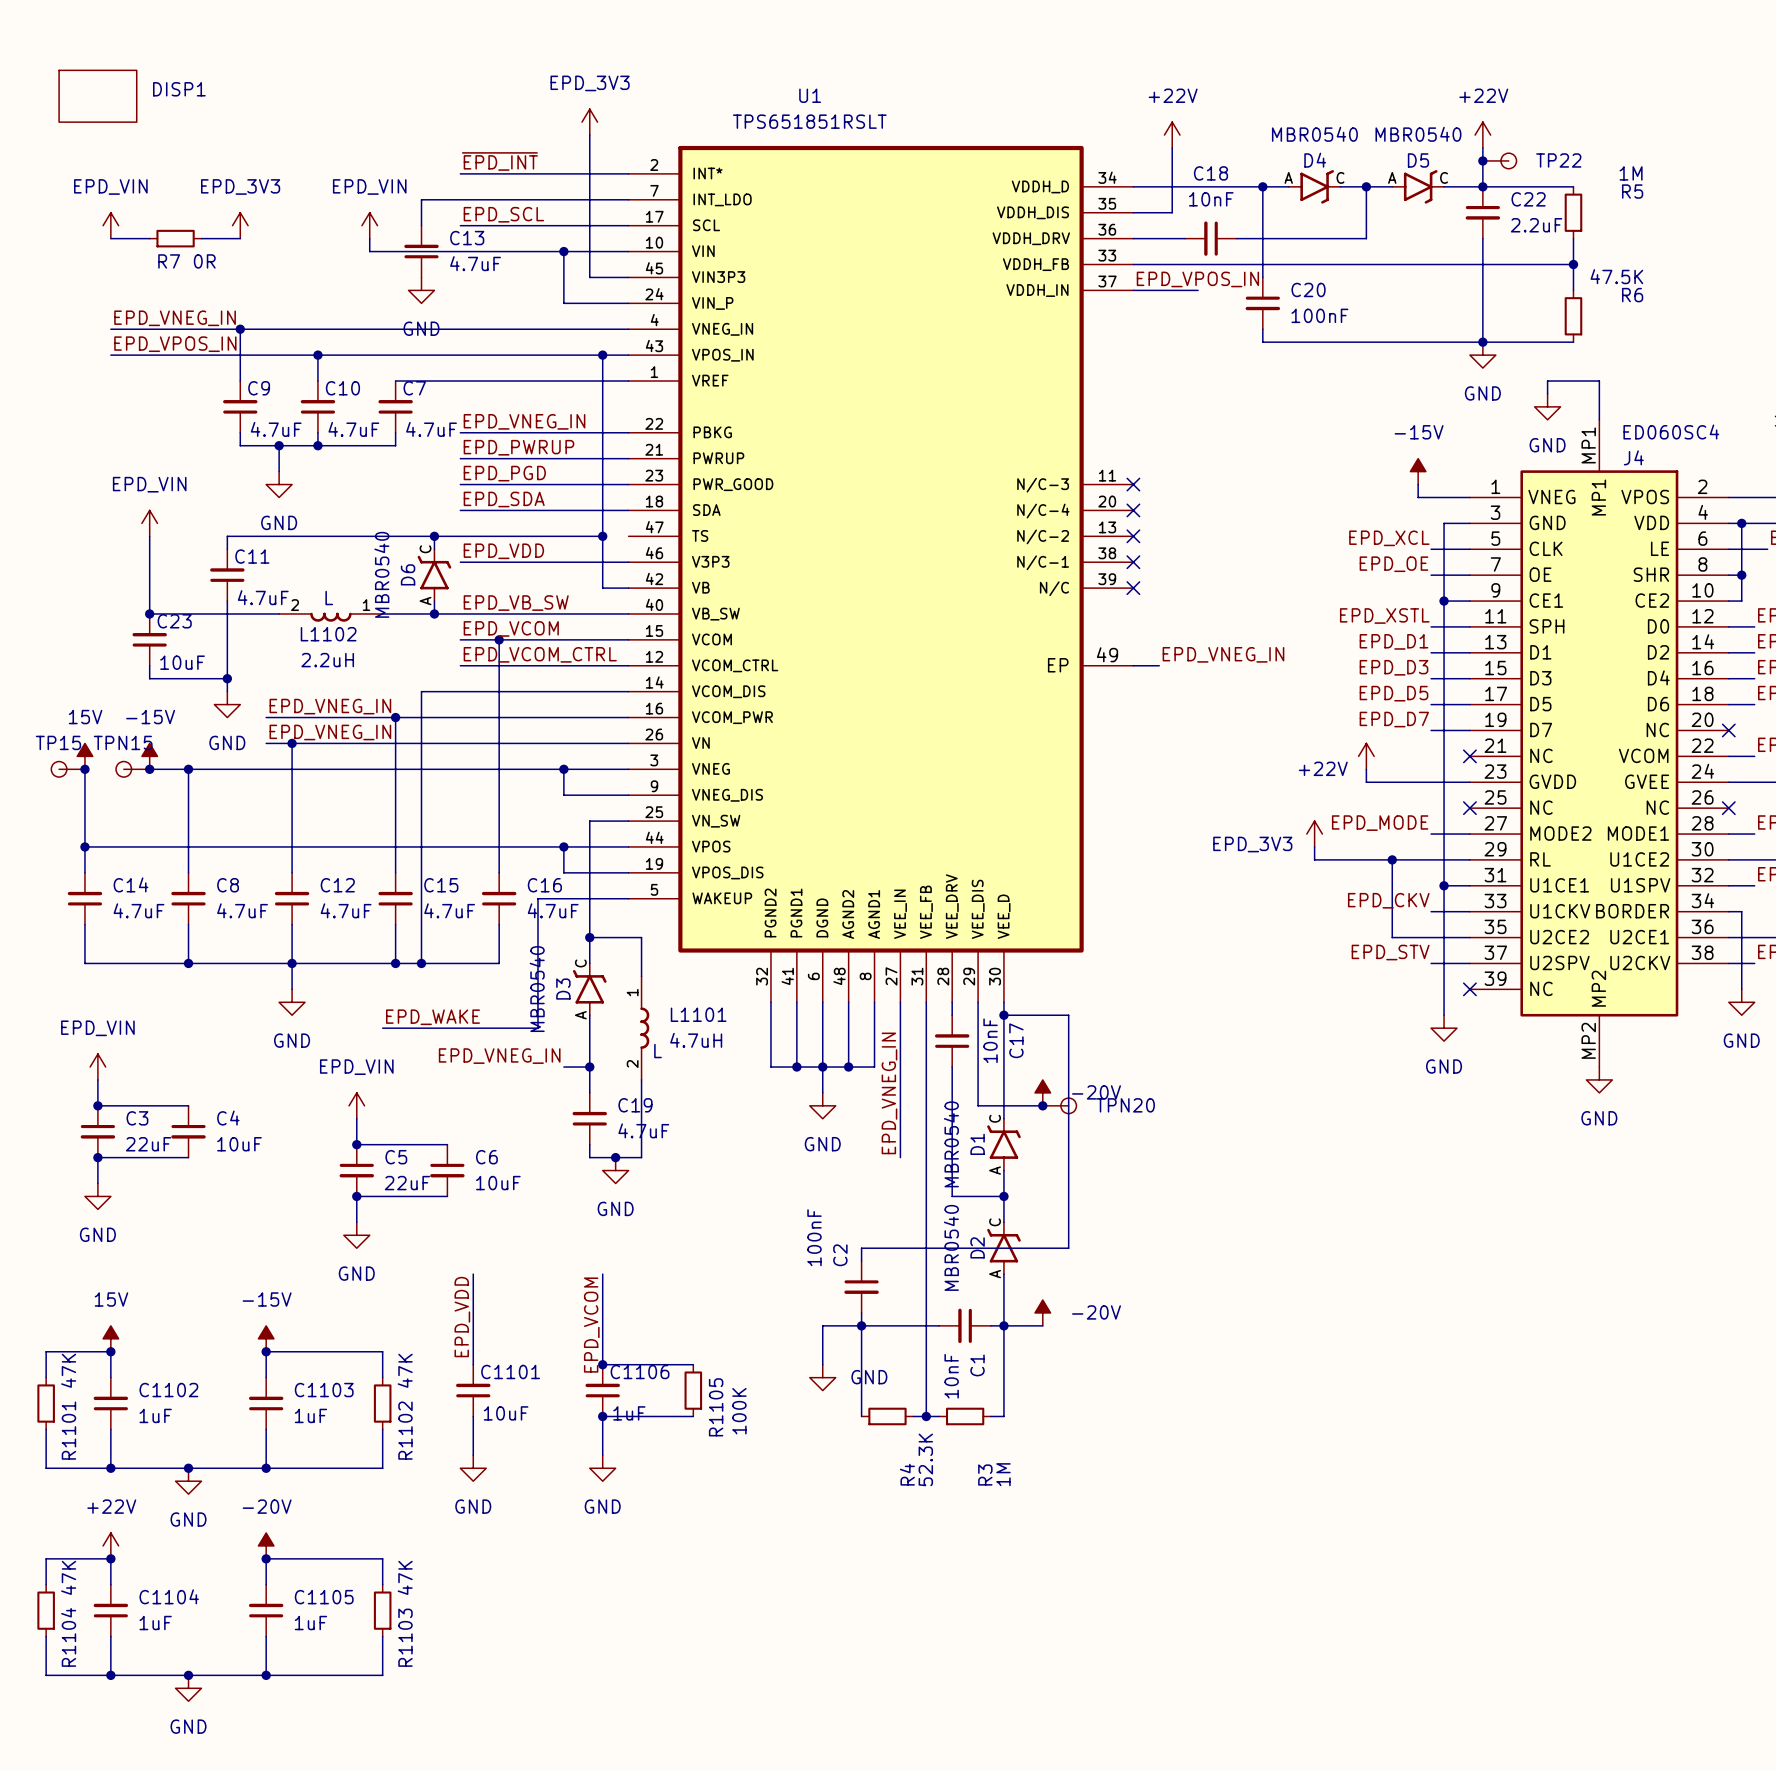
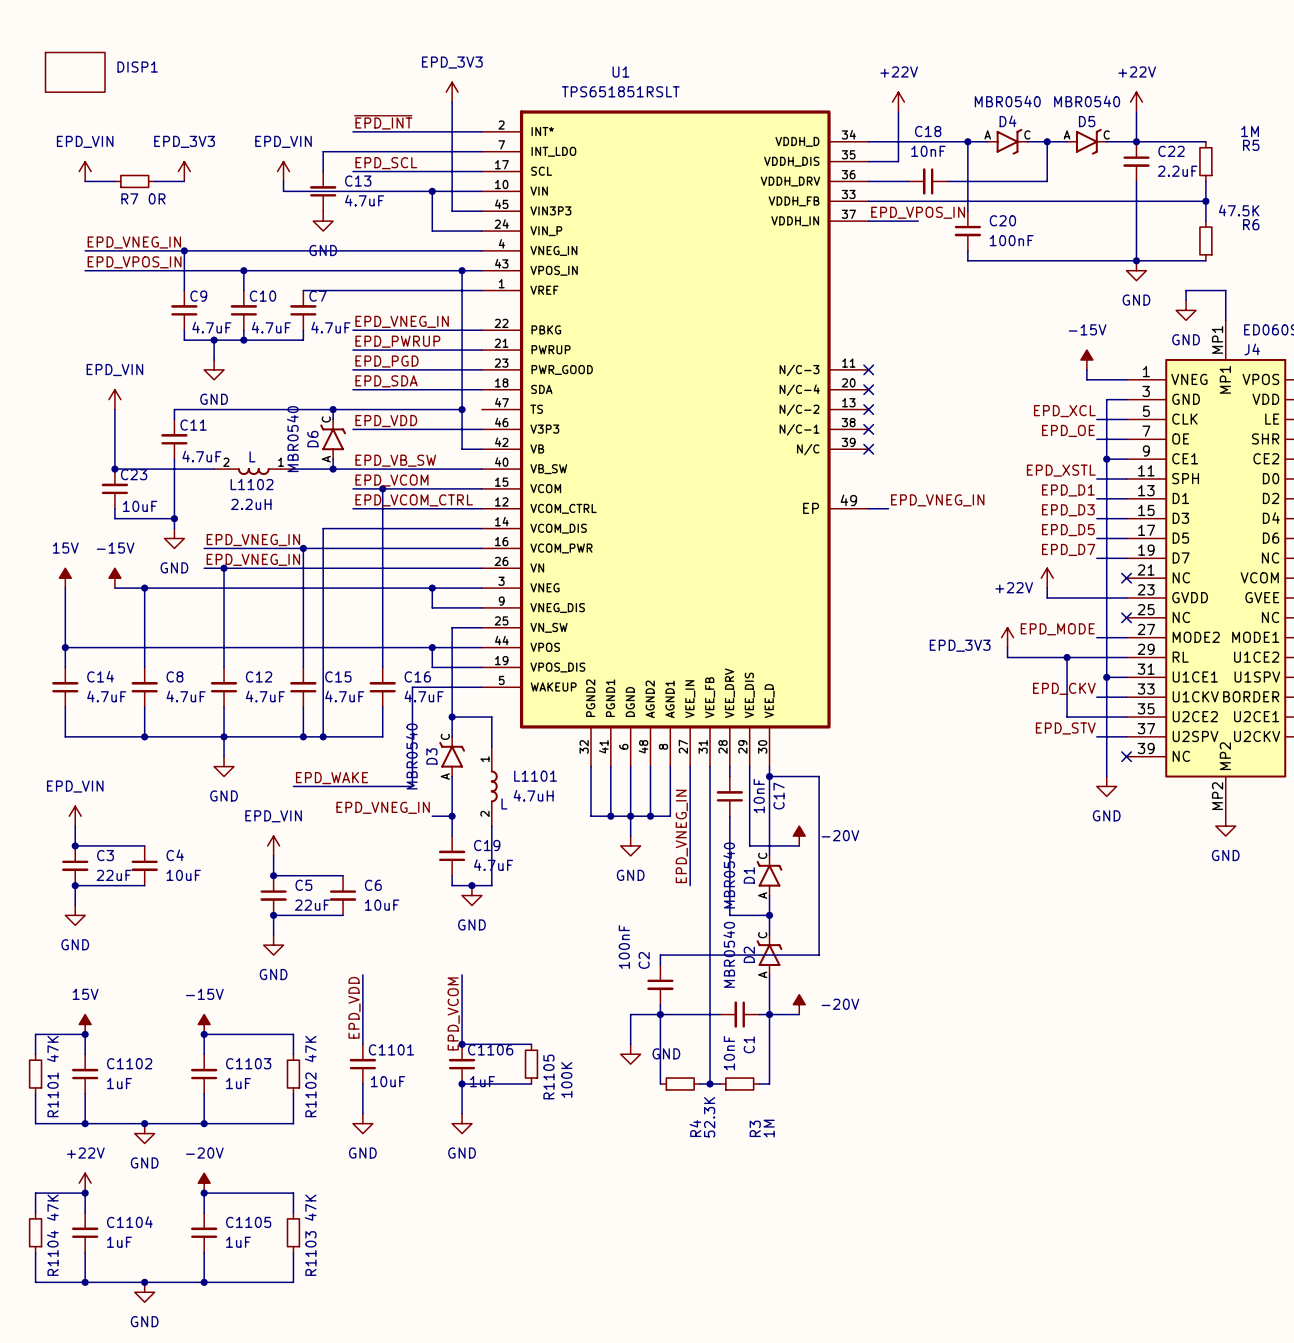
junction: (1482, 160) -> none
TP22: (1499, 160) -> none
TP15: (68, 769) -> none
junction: (84, 769) -> none
TPN15: (132, 769) -> none
junction: (149, 769) -> none
junction: (1042, 1105) -> none
TPN20: (1059, 1105) -> none

